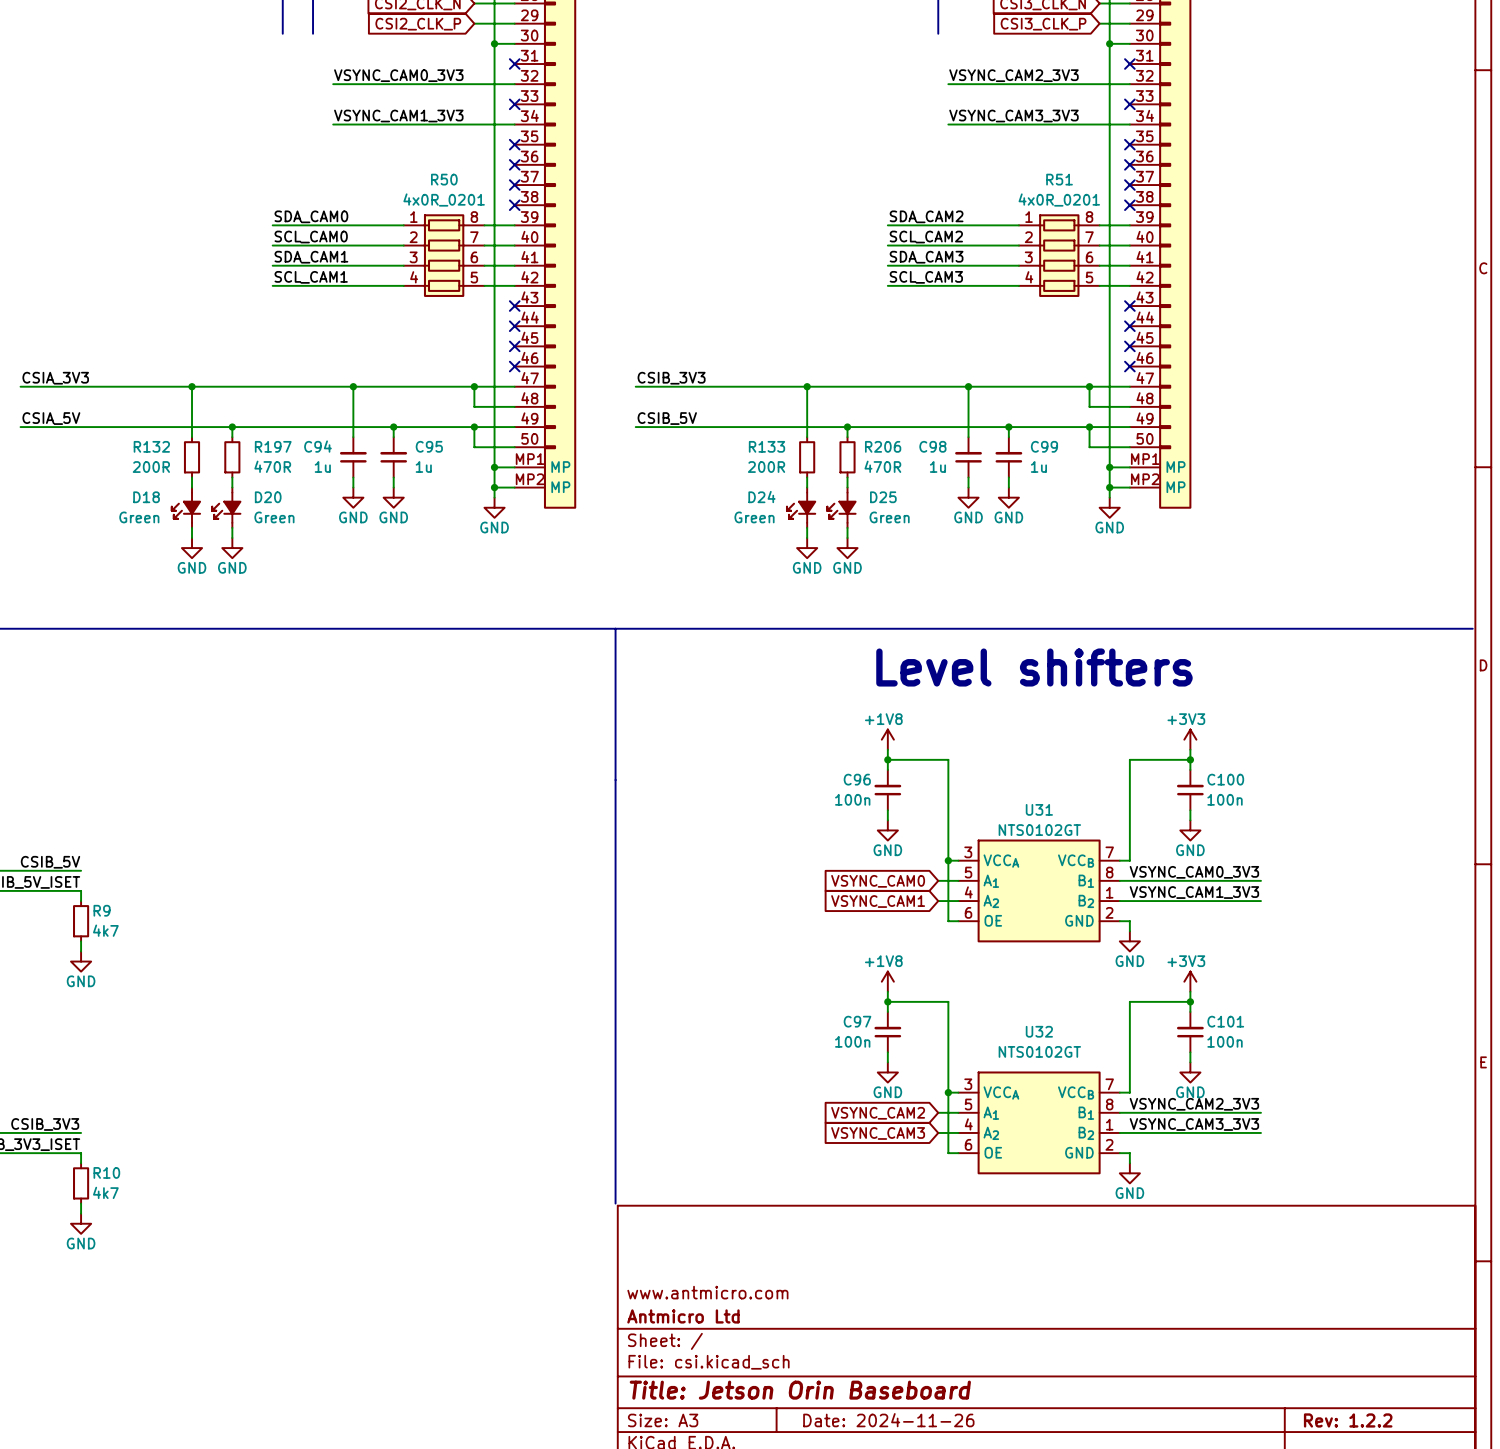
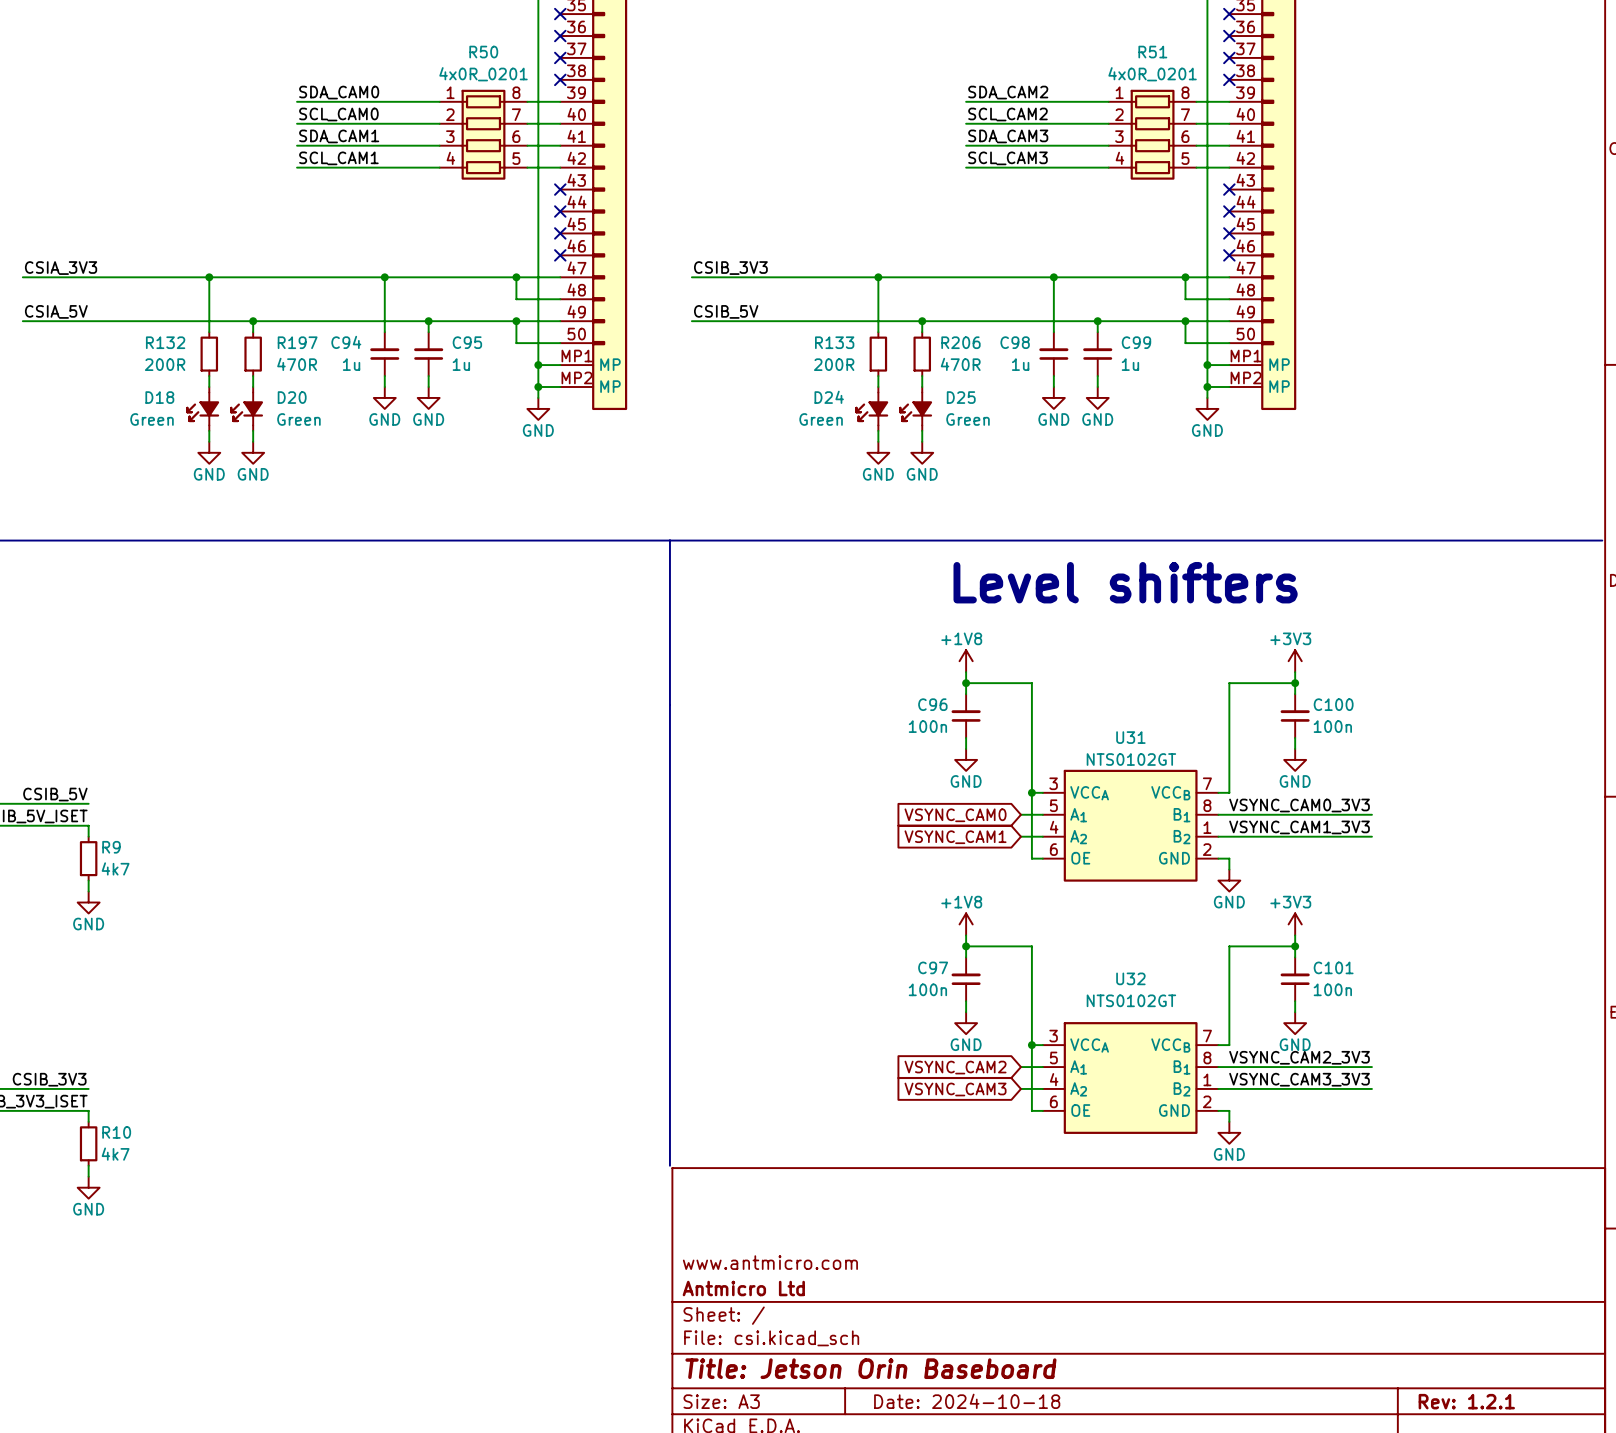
title block: Date: 2024-11-26 (888, 1420) -> Date: 2024-10-18 (967, 1401)
title block: Rev: 1.2.2 (1348, 1420) -> Rev: 1.2.1 (1466, 1401)

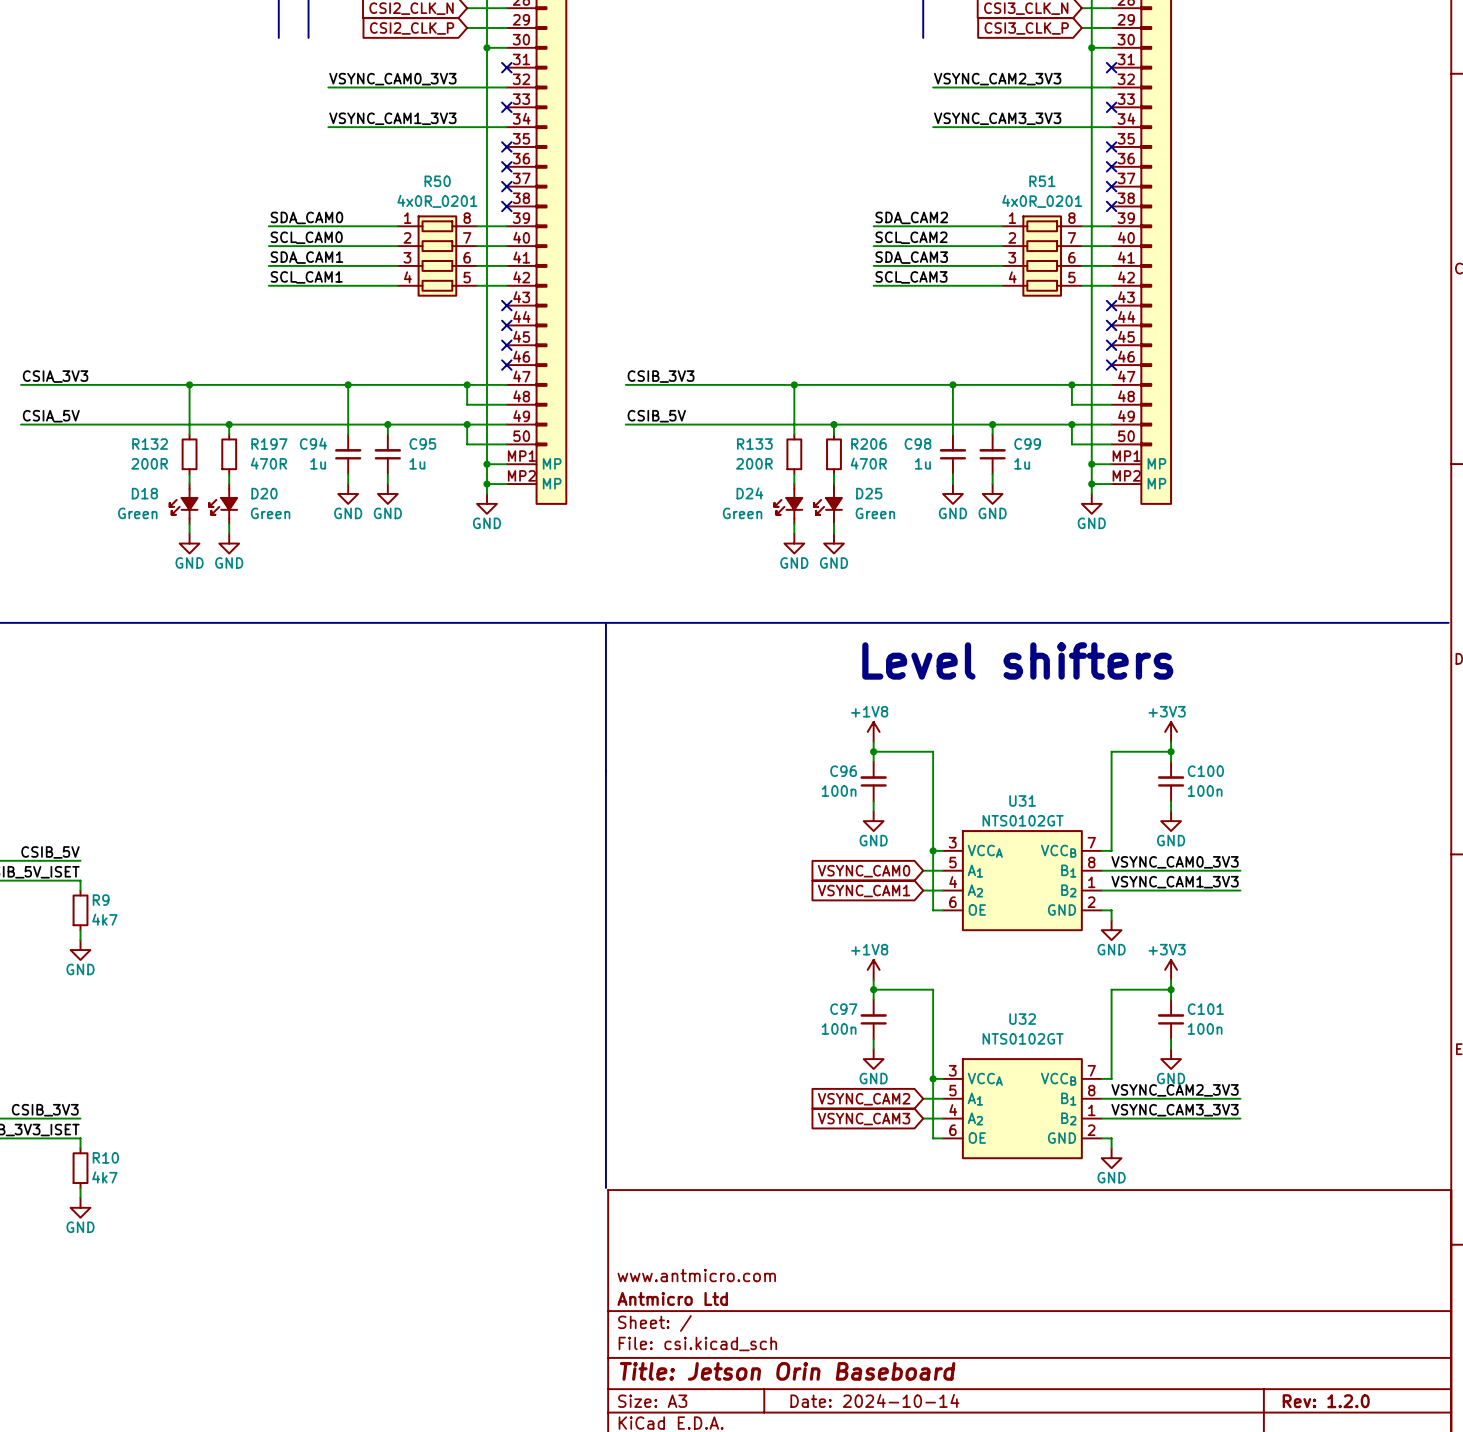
title block: Date: 2024-10-18 (967, 1401) -> Date: 2024-10-14 (874, 1400)
title block: Rev: 1.2.1 (1466, 1401) -> Rev: 1.2.0 (1326, 1401)

